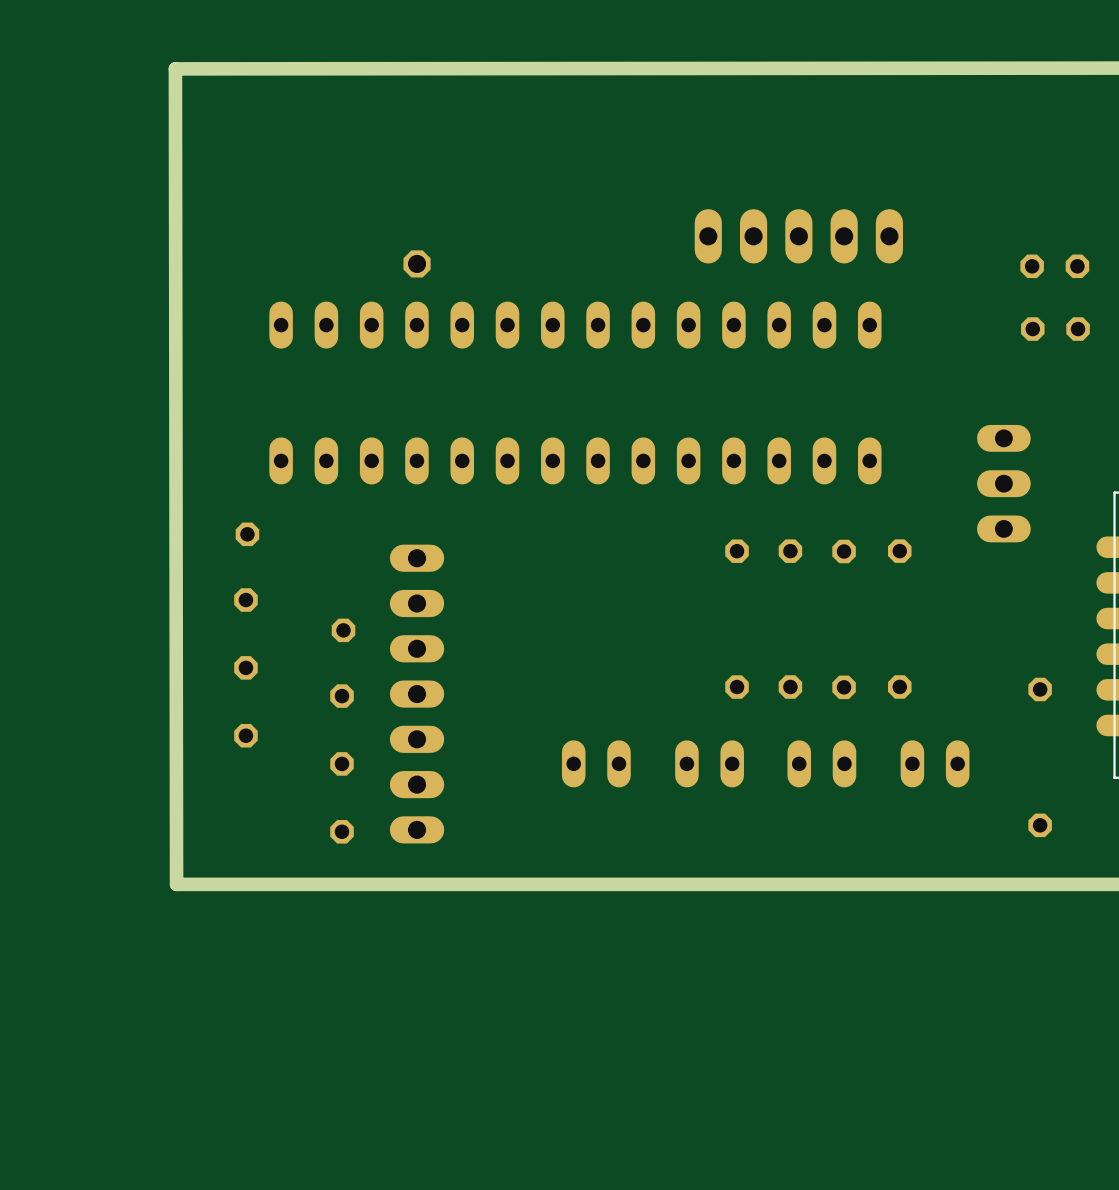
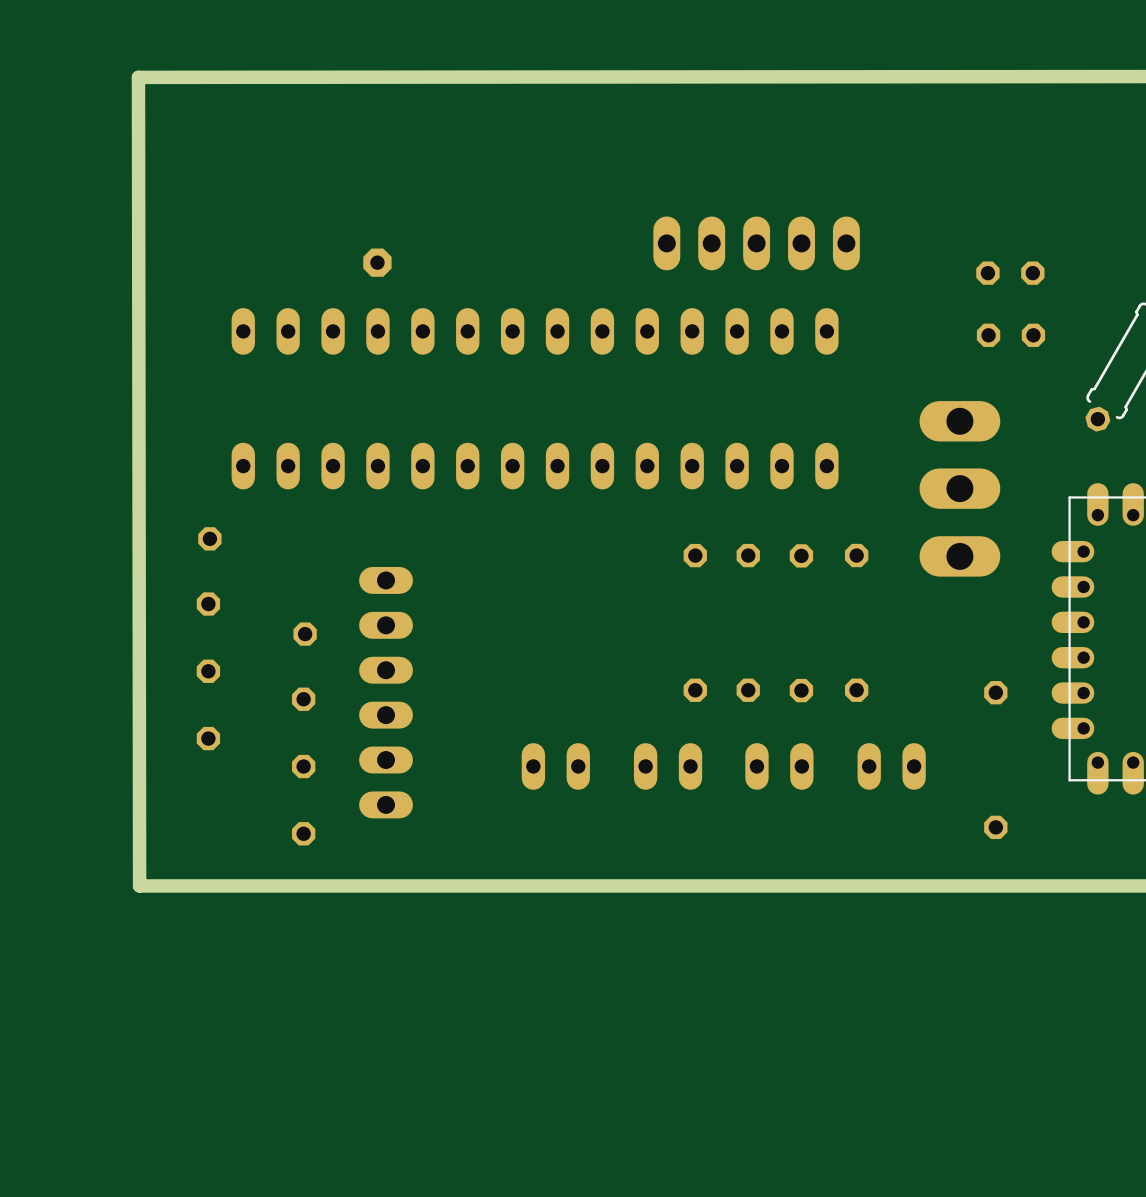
part footprint: [403, 250, 431, 278] -> [363, 248, 392, 277]
part footprint: [977, 424, 1031, 543] -> [919, 401, 1001, 577]
part footprint: [389, 544, 445, 844] -> [359, 566, 413, 819]

